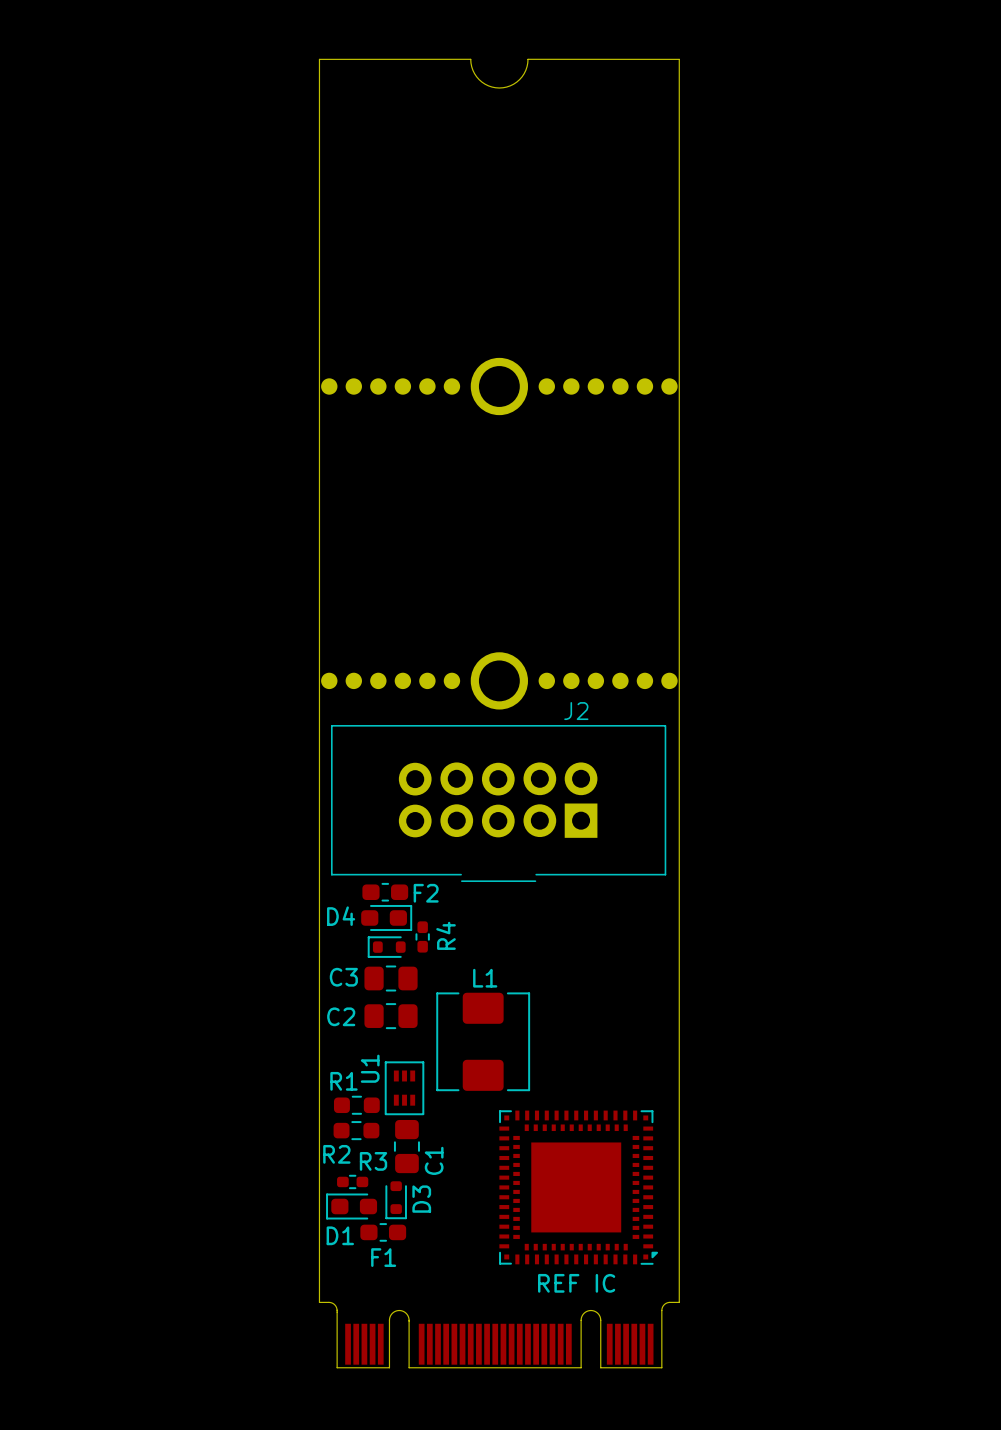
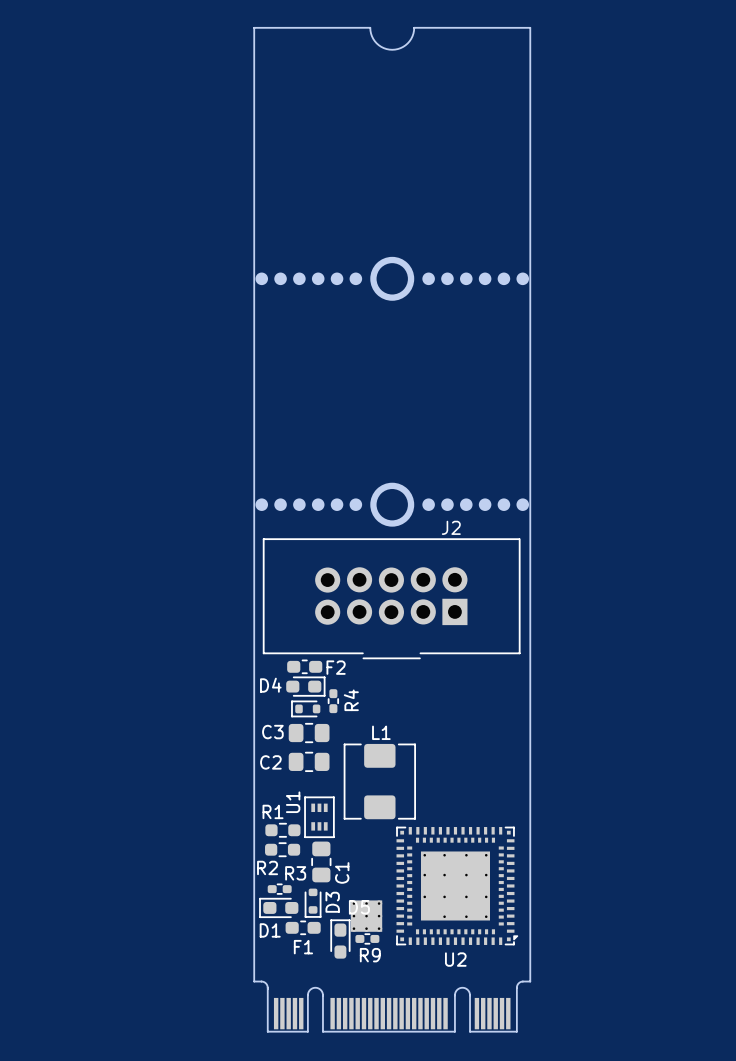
U2: none -> (457, 885)
REF IC: (578, 1187) -> none
part: none -> (366, 916)
R9: none -> (367, 938)
part: none -> (340, 939)

